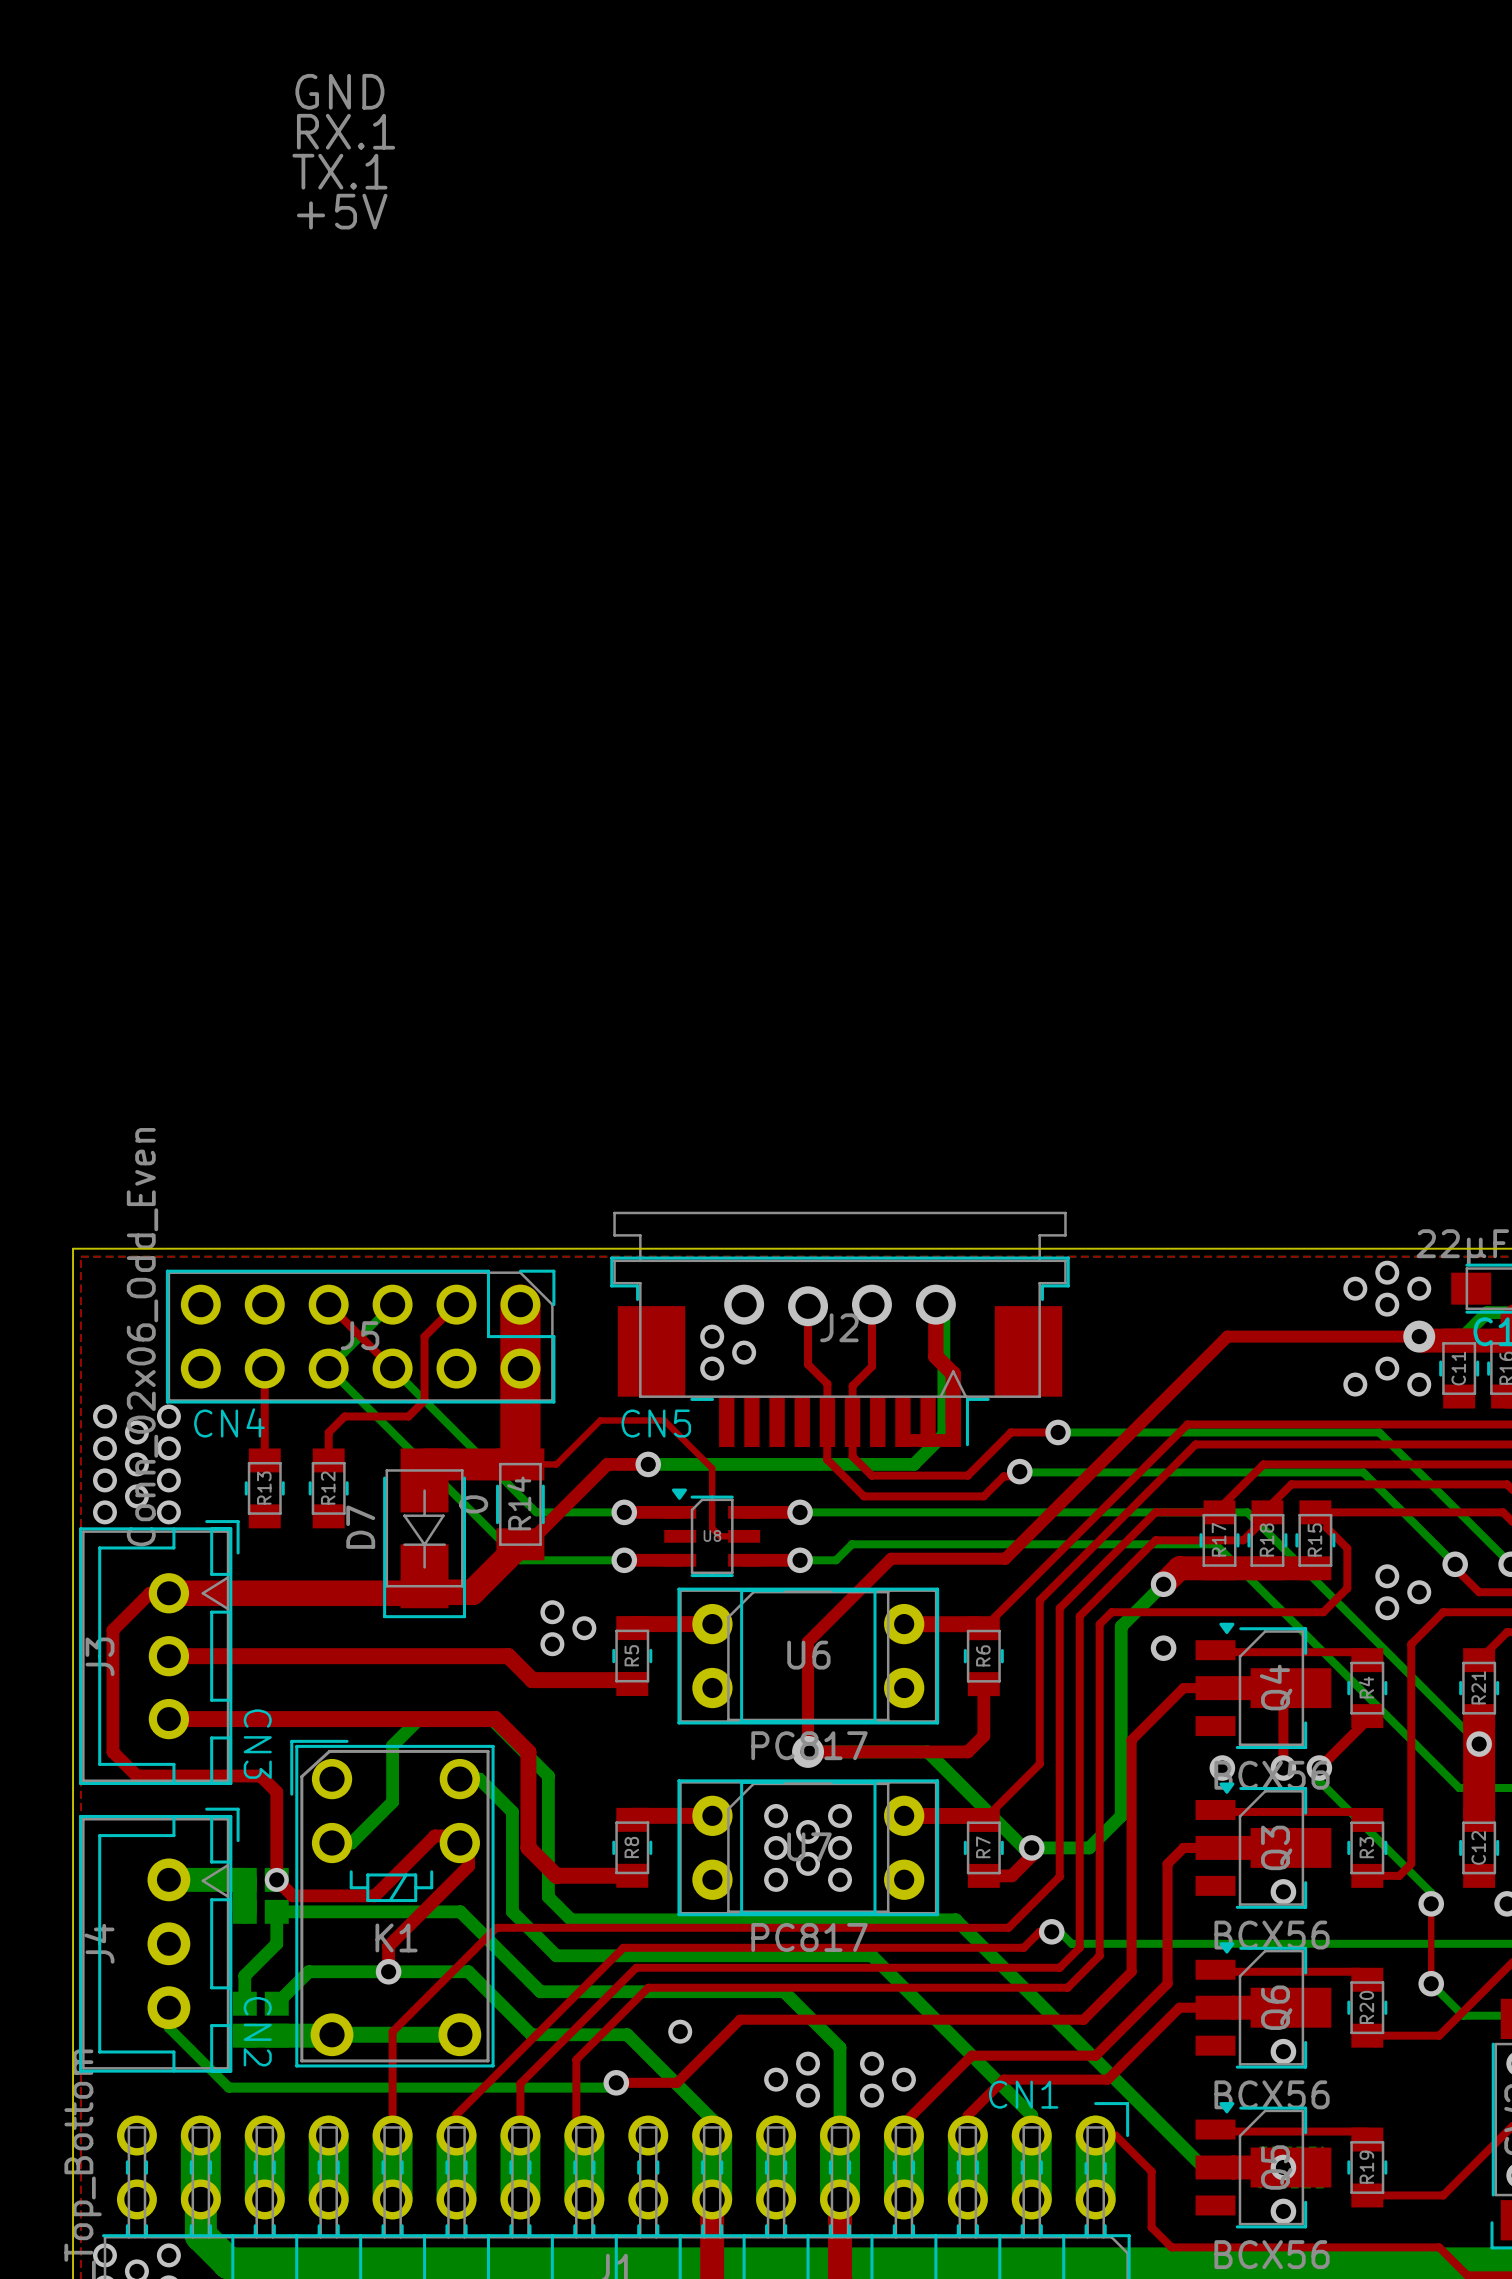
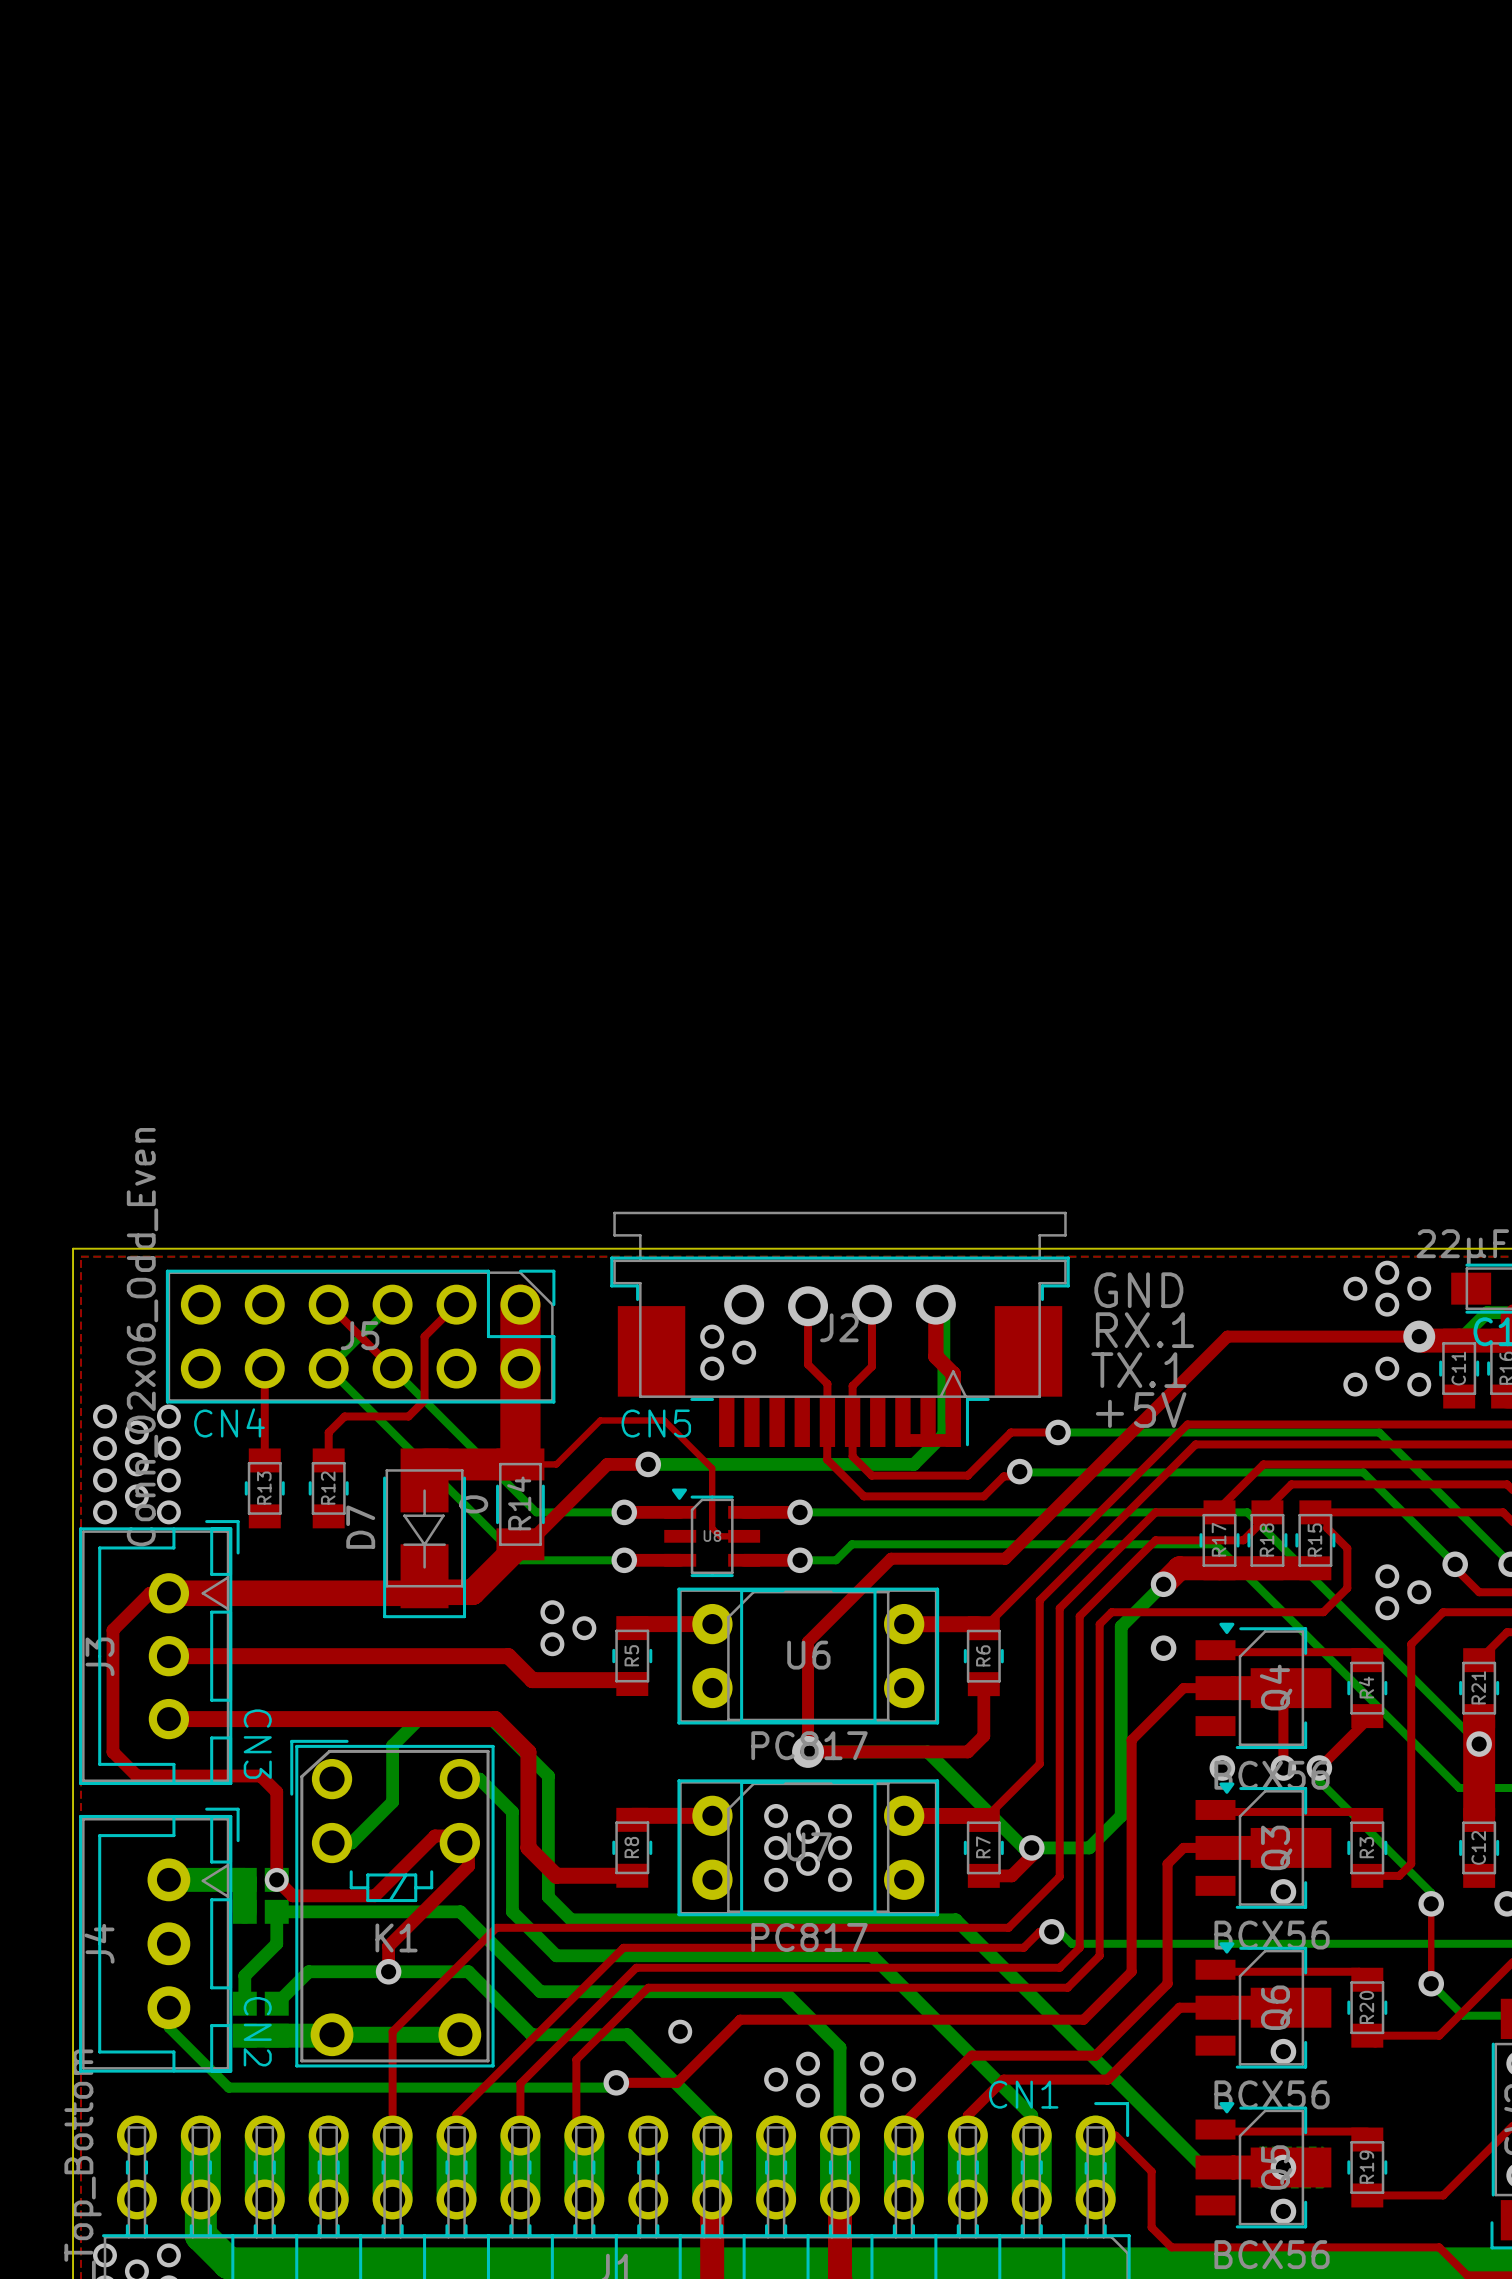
text: GND (339, 91) -> none
text: RX.1 (346, 131) -> none
text: TX.1 (339, 171) -> none
text: +5V (342, 211) -> none
text: none -> GND (1138, 1290)
text: none -> RX.1 (1144, 1330)
text: none -> TX.1 (1138, 1370)
text: none -> +5V (1141, 1410)

